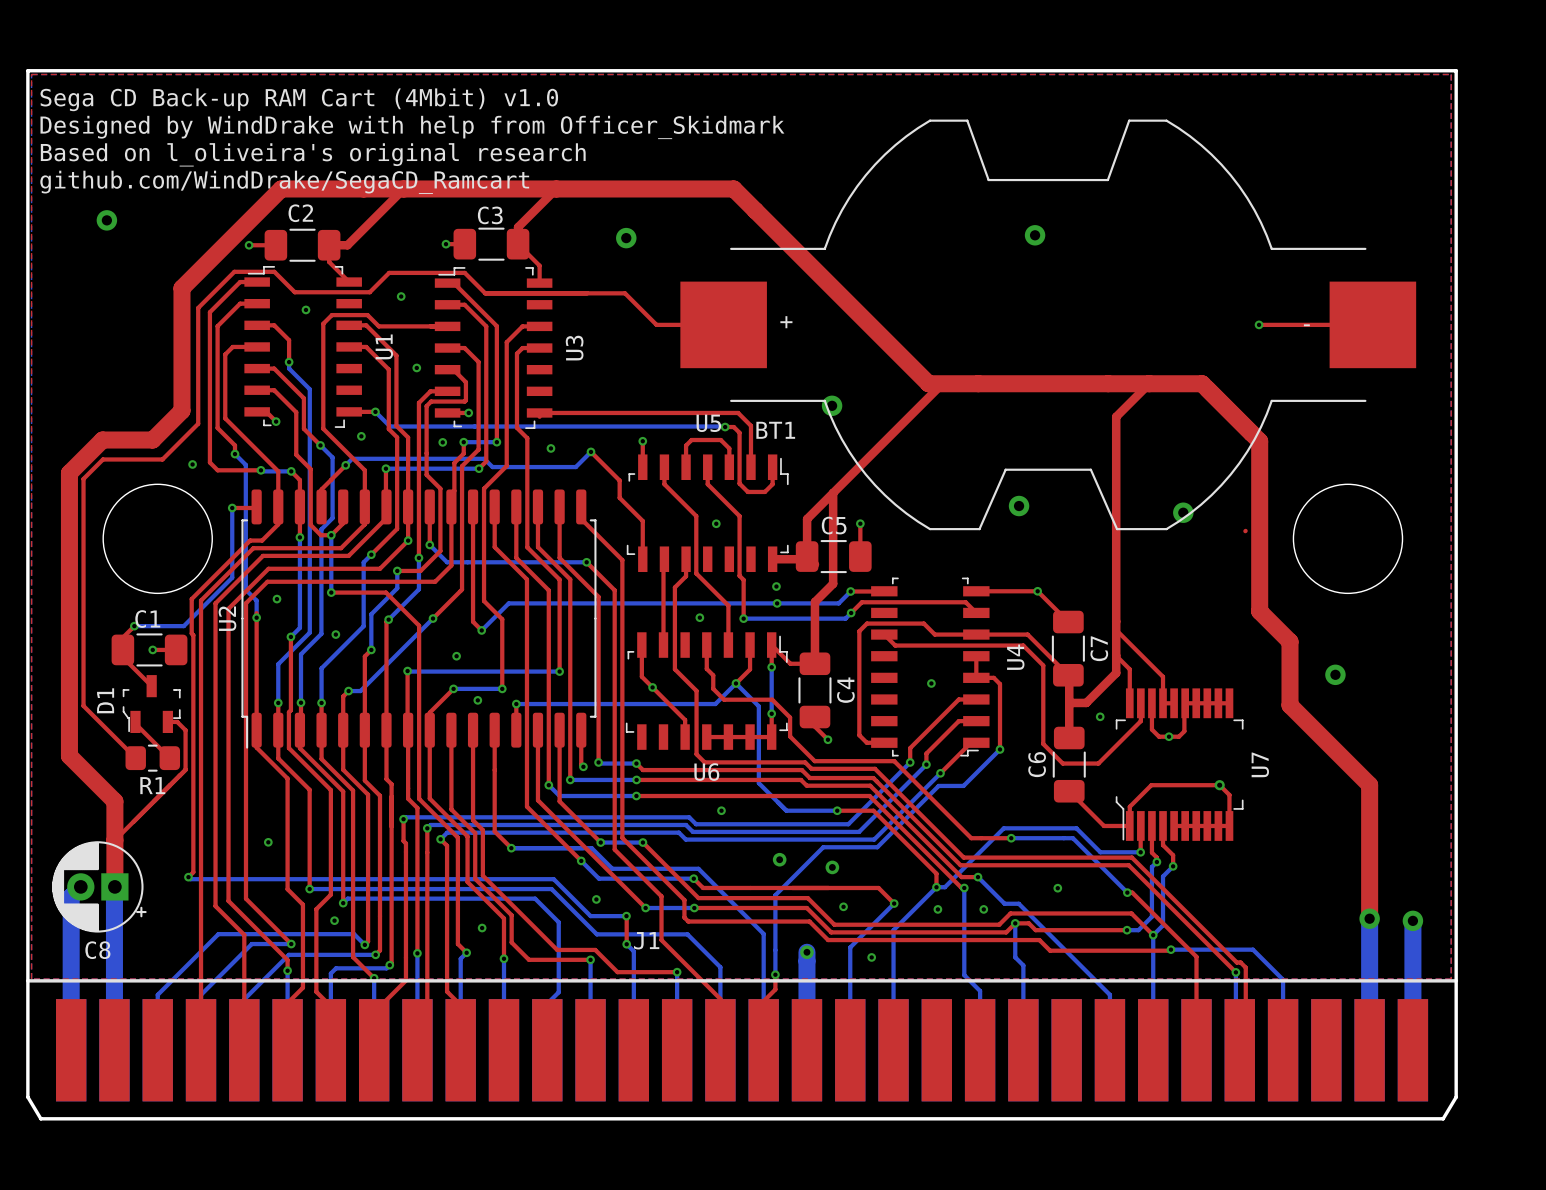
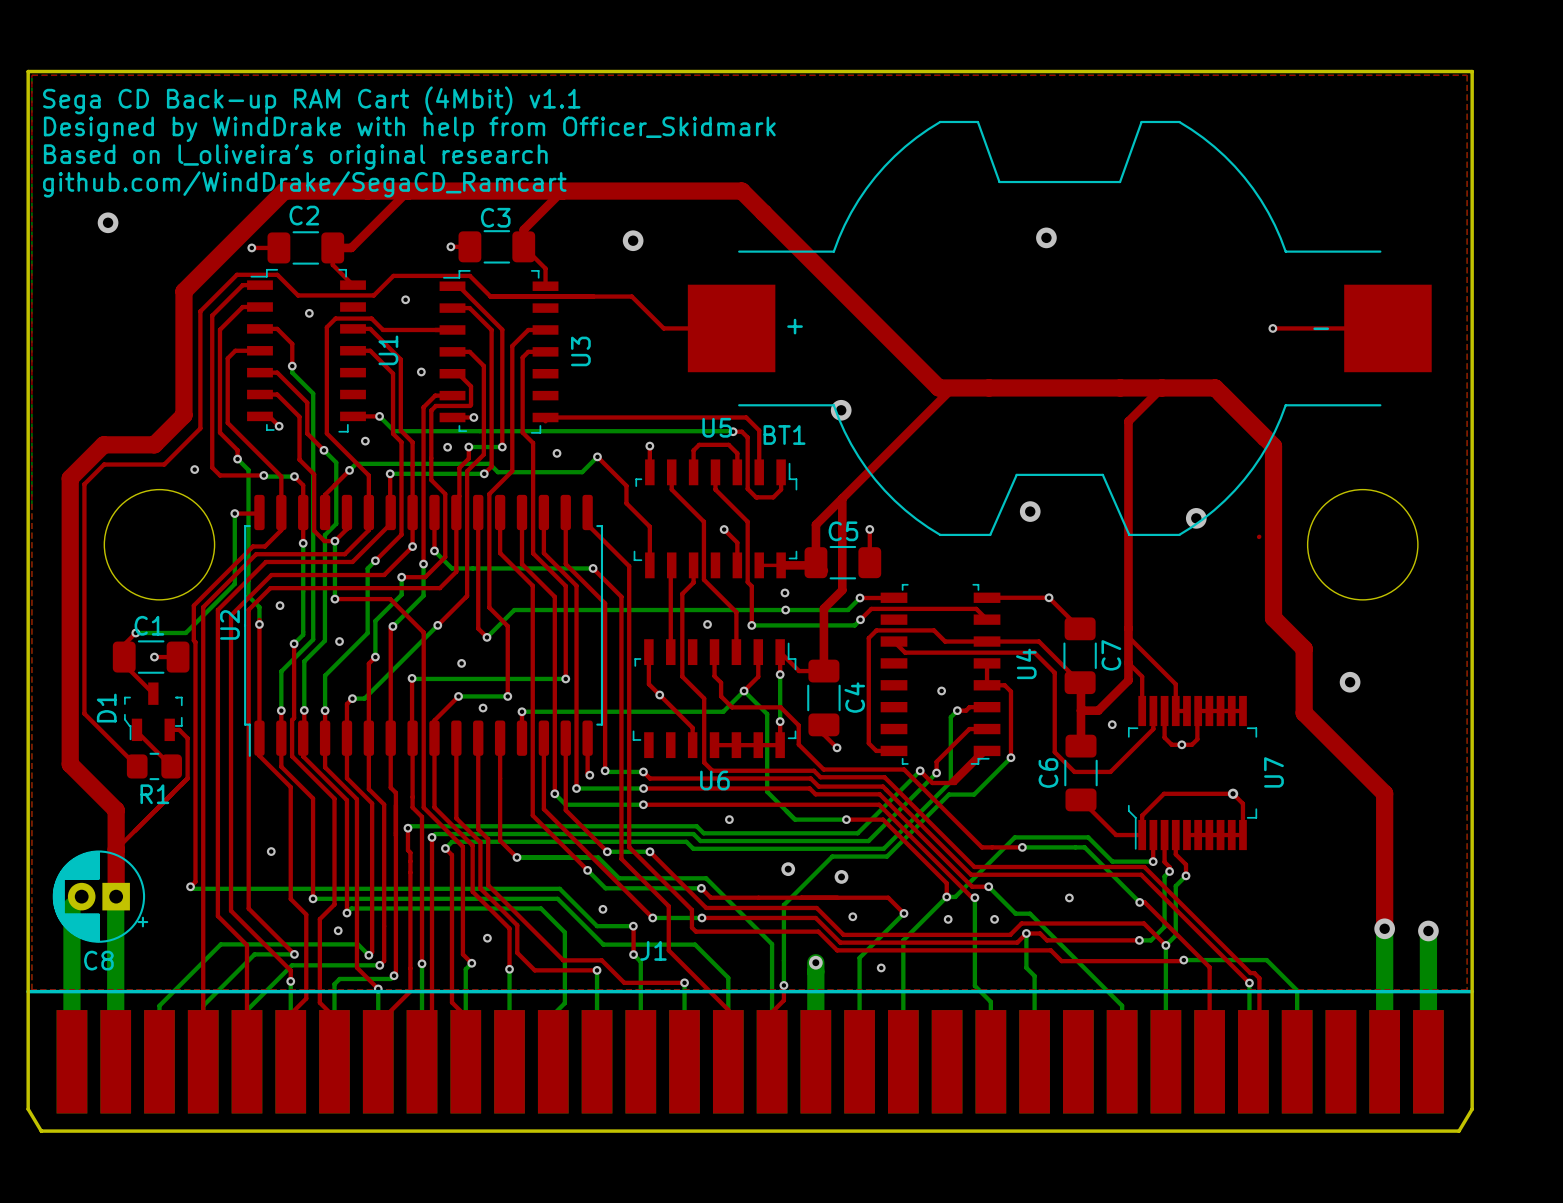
text: Sega CD Back-up RAM Cart (4Mbit) v1.0 (299, 99) -> Sega CD Back-up RAM Cart (4Mbit) v1.1 (311, 100)
top track: none -> (724, 529) (737, 542) (737, 565)
top track: none -> (759, 565) (781, 565)
top track: (958, 699) (910, 748) (910, 762) -> (987, 750) (954, 783) (932, 783) (920, 770)
top track: none -> (969, 707) (966, 710) (957, 710)
bottom track: none -> (957, 710) (950, 717) (950, 781)
via position: (940, 773) -> (957, 710)

